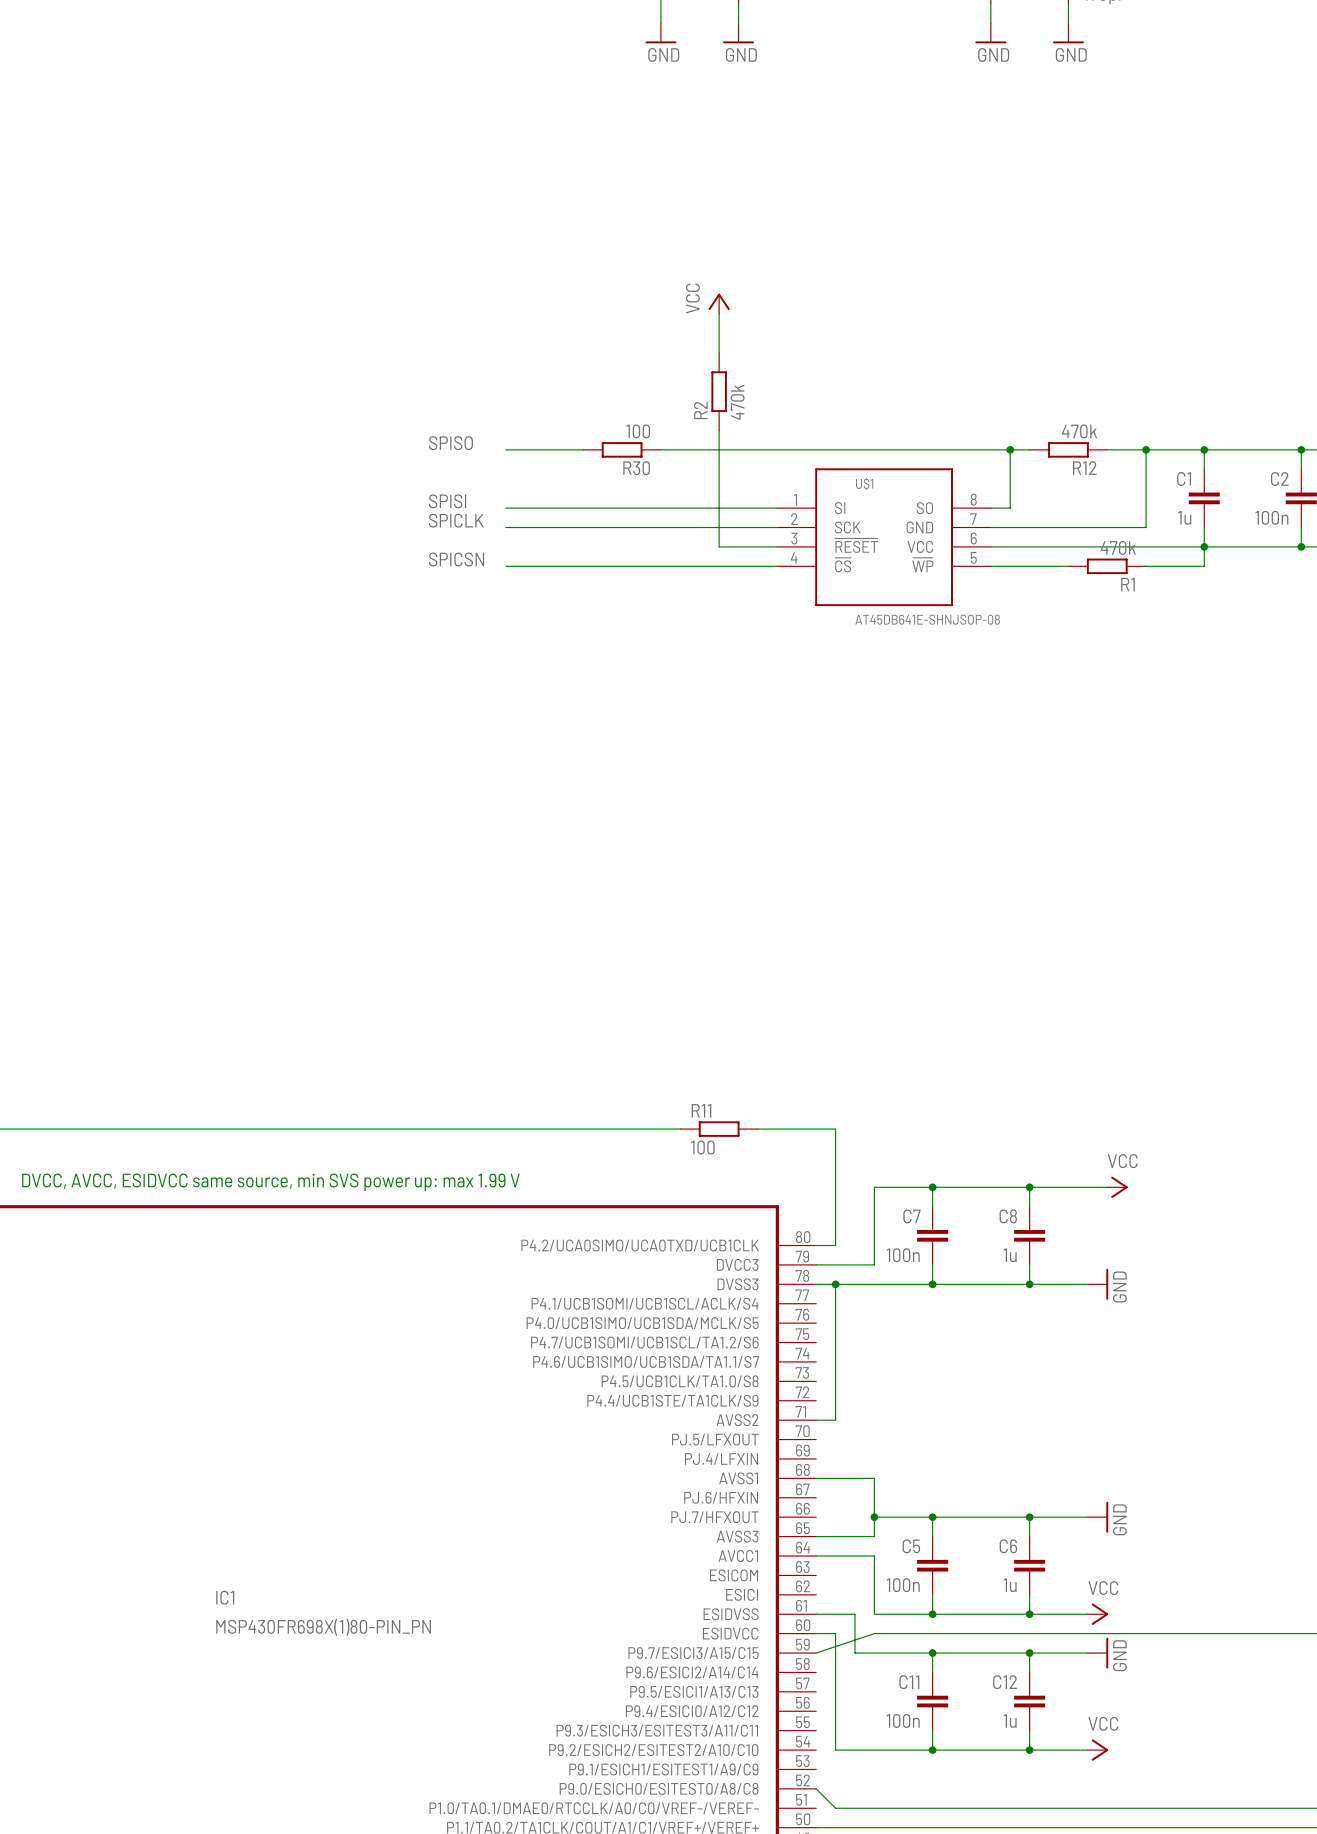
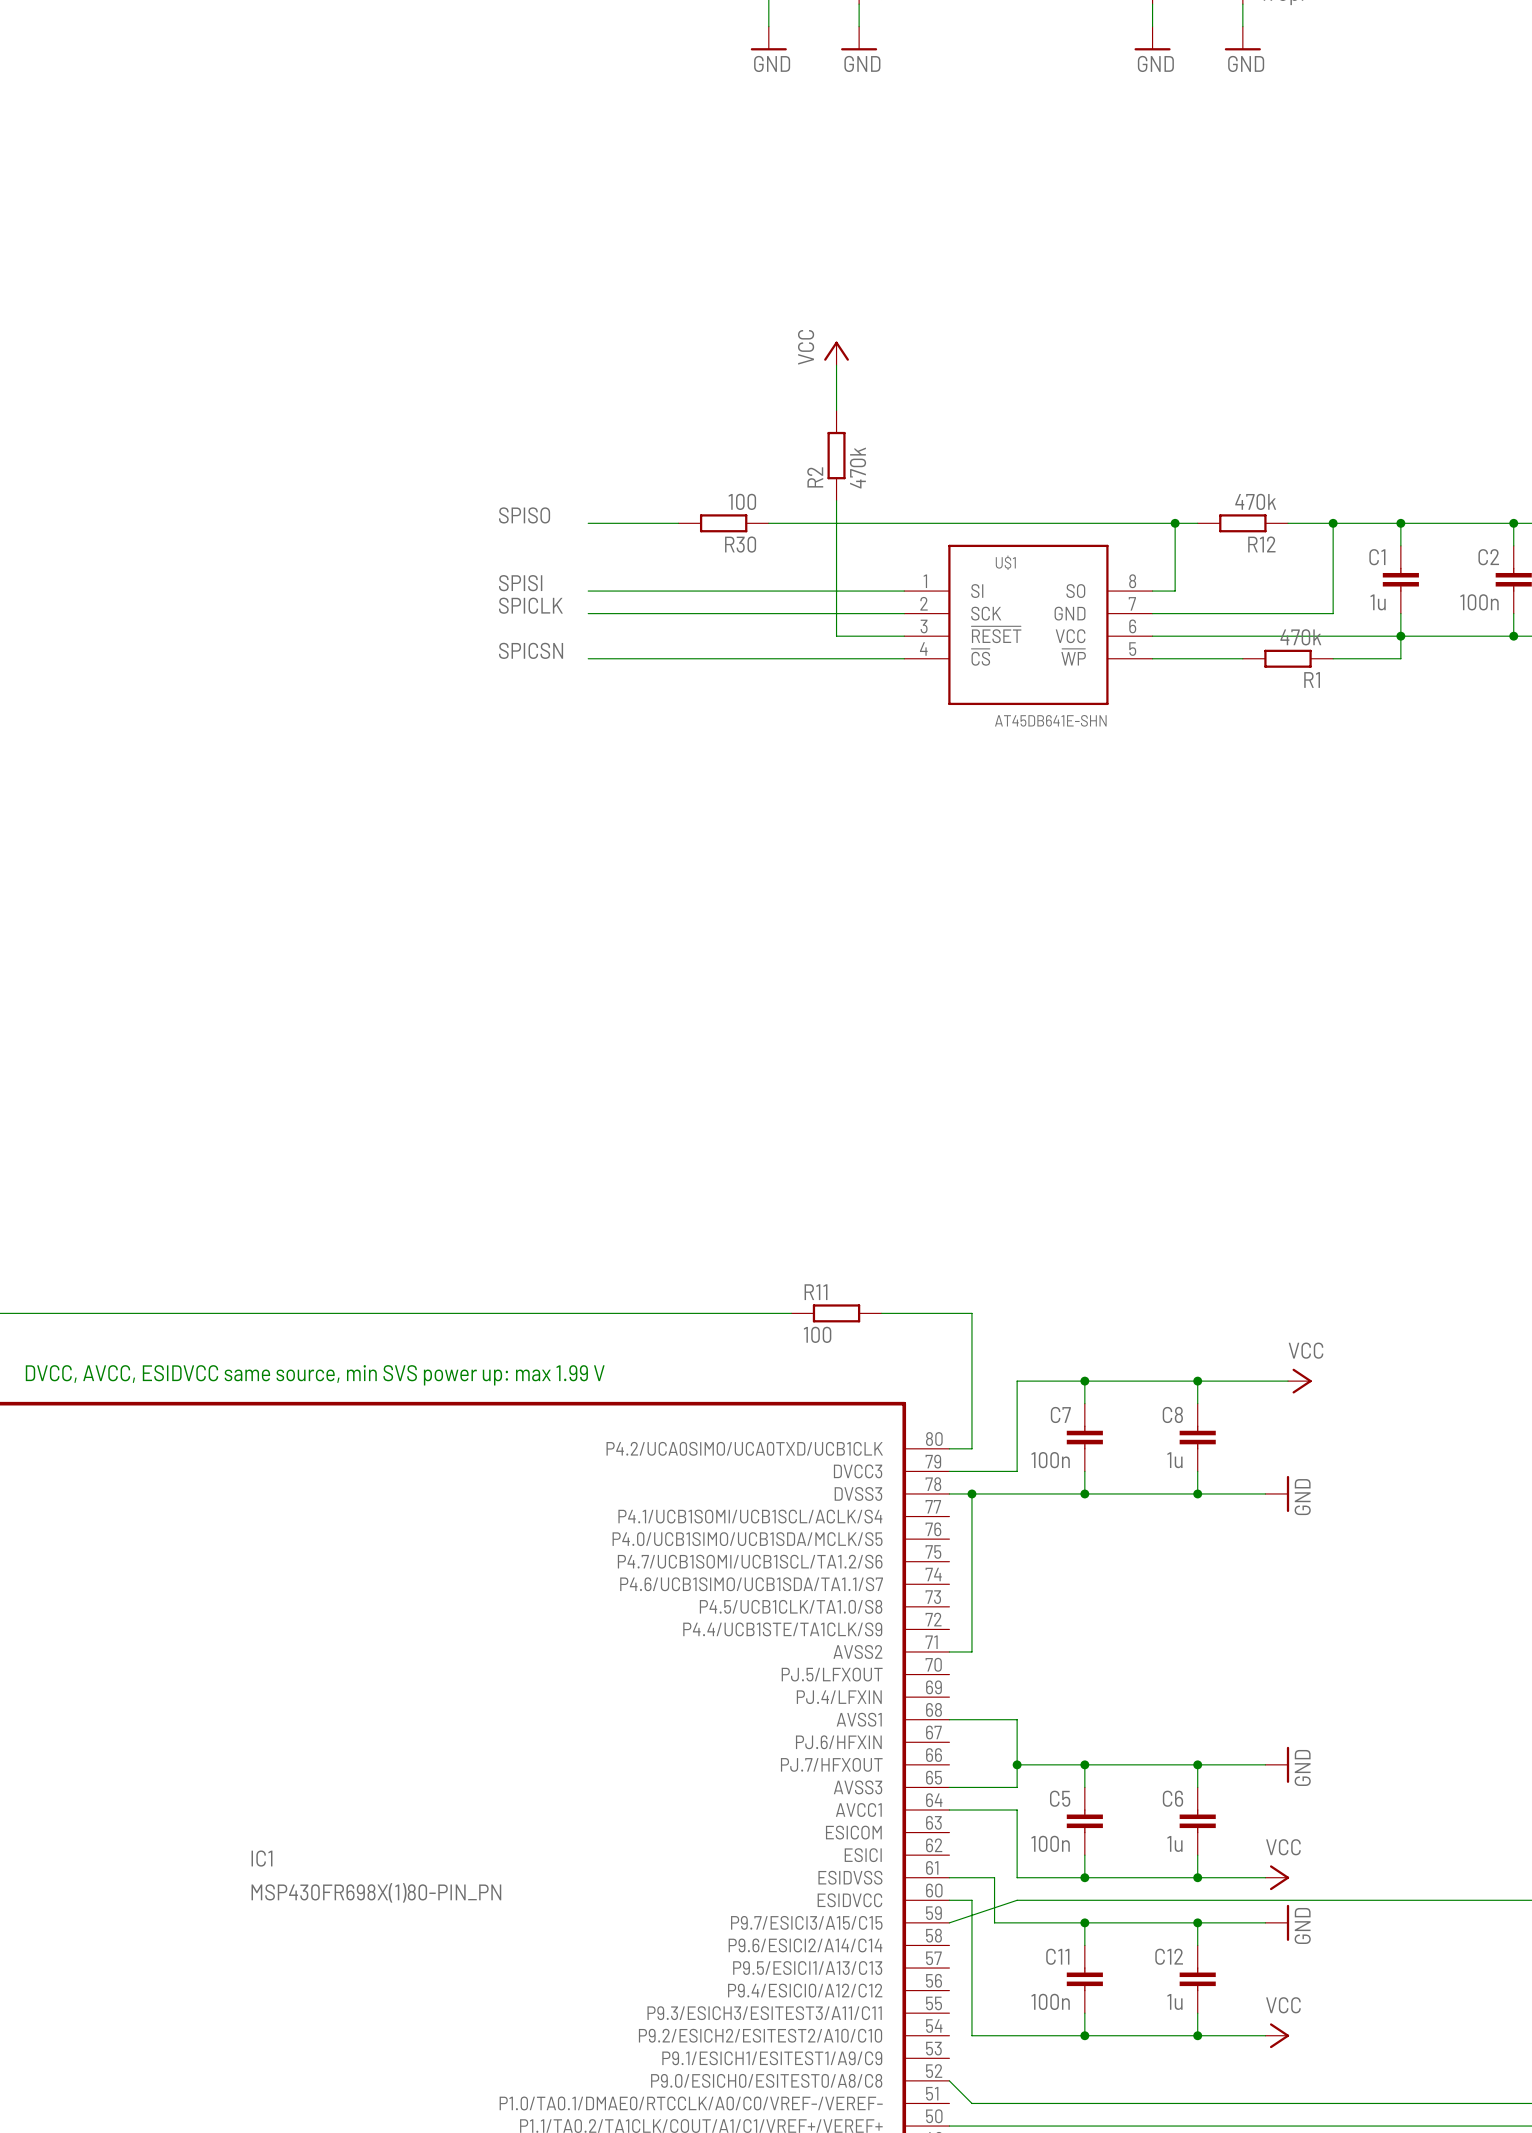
U$1 value: AT45DB641E-SHNJSOP-08 (927, 619) -> AT45DB641E-SHN (1050, 720)

